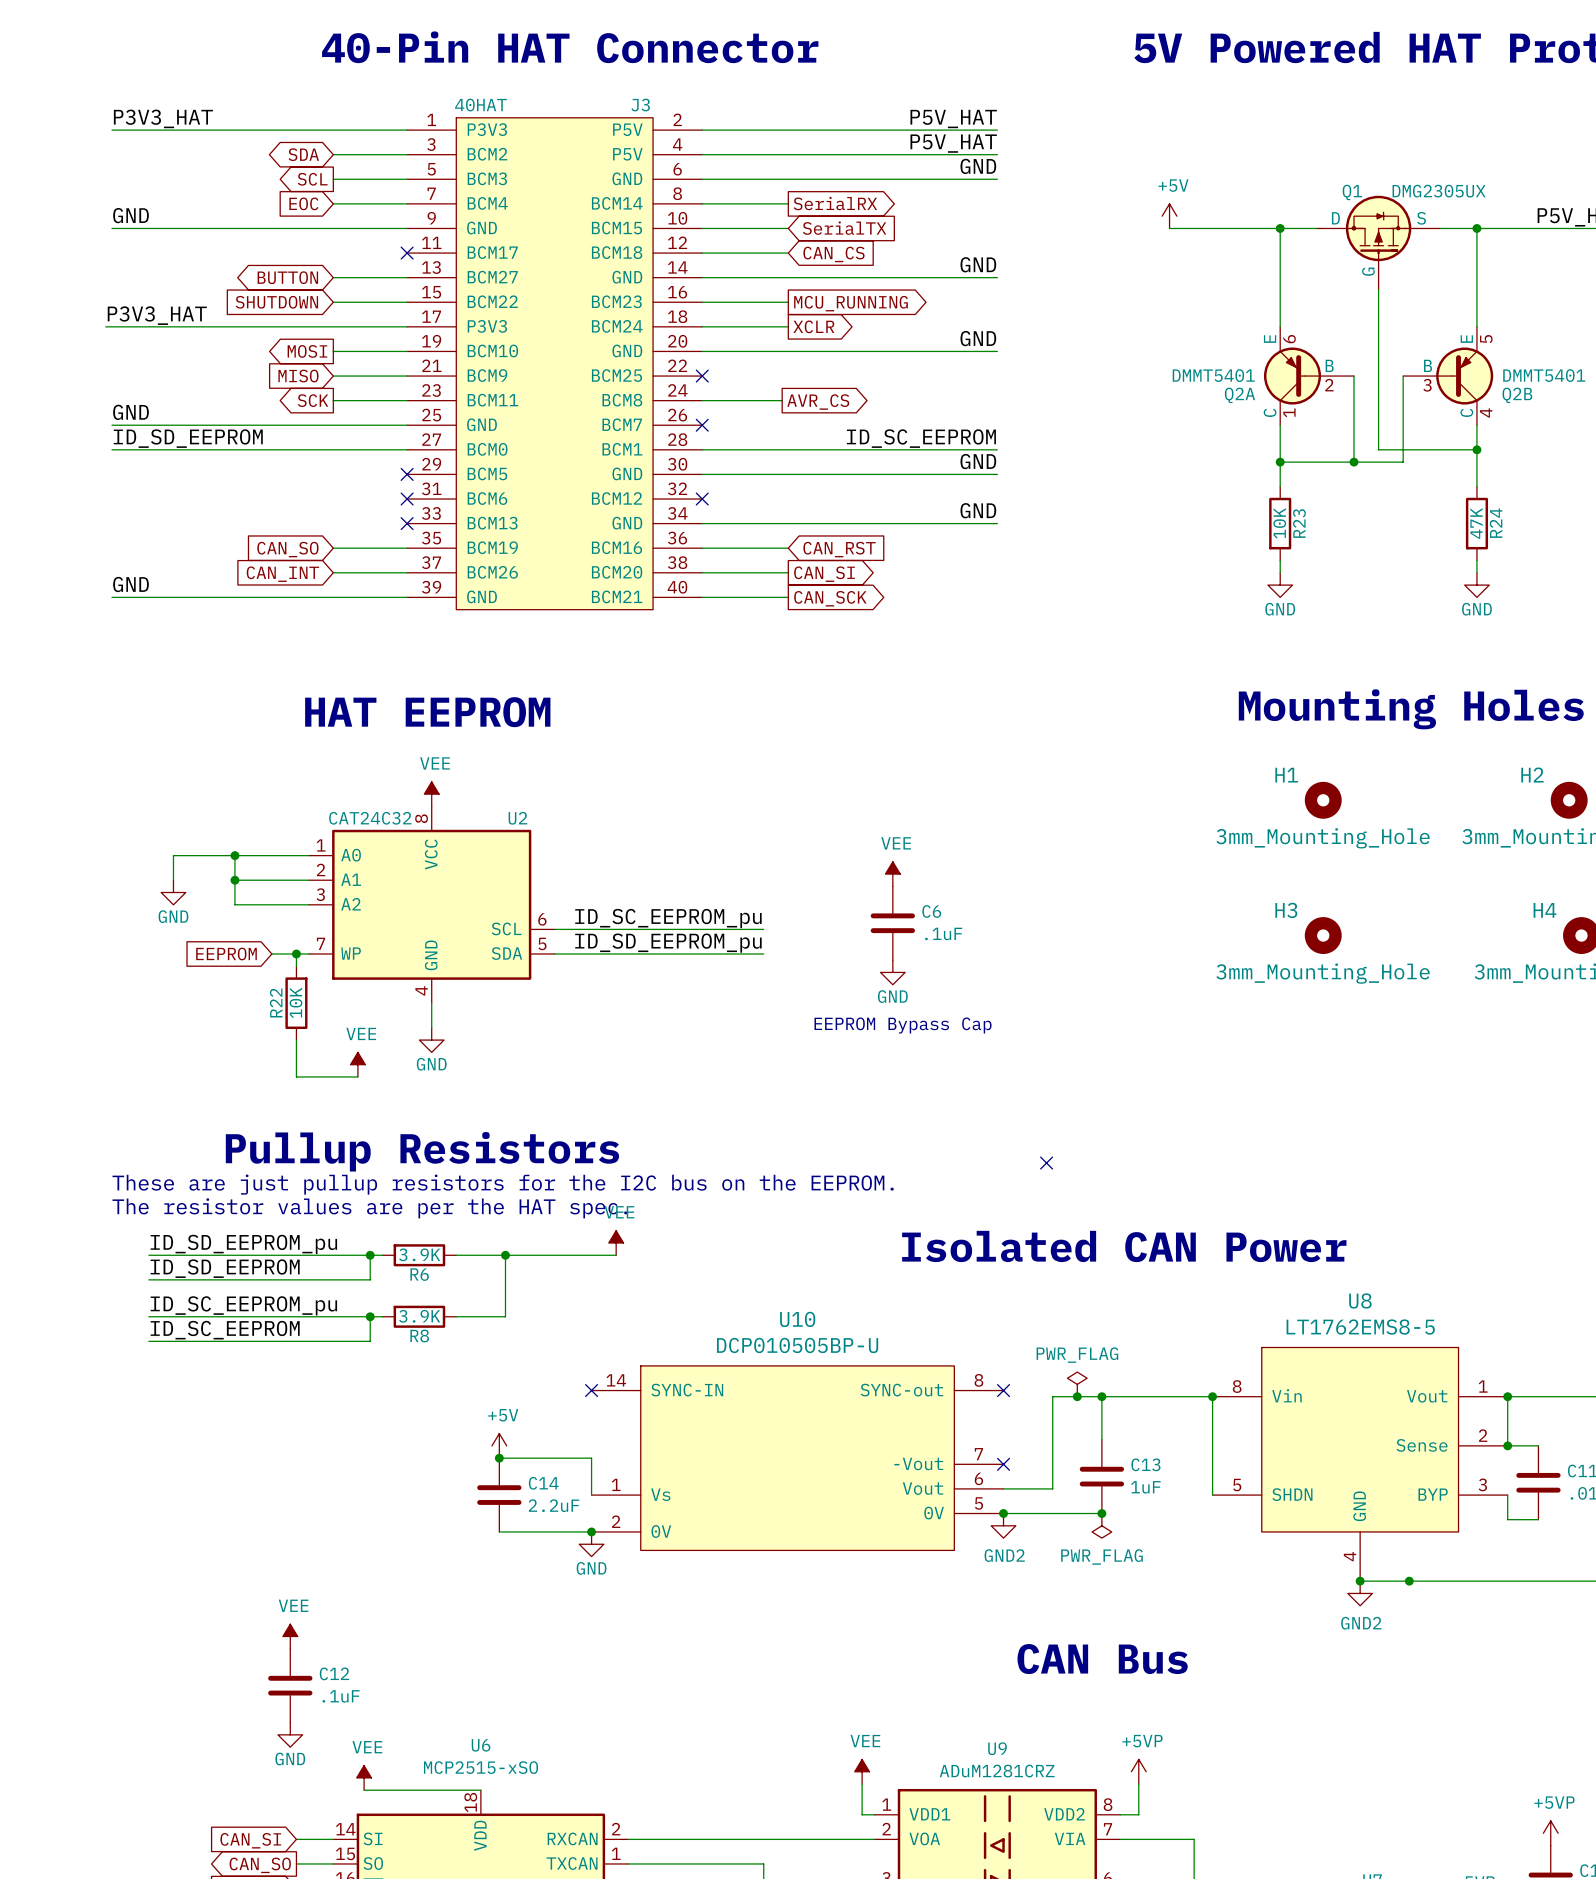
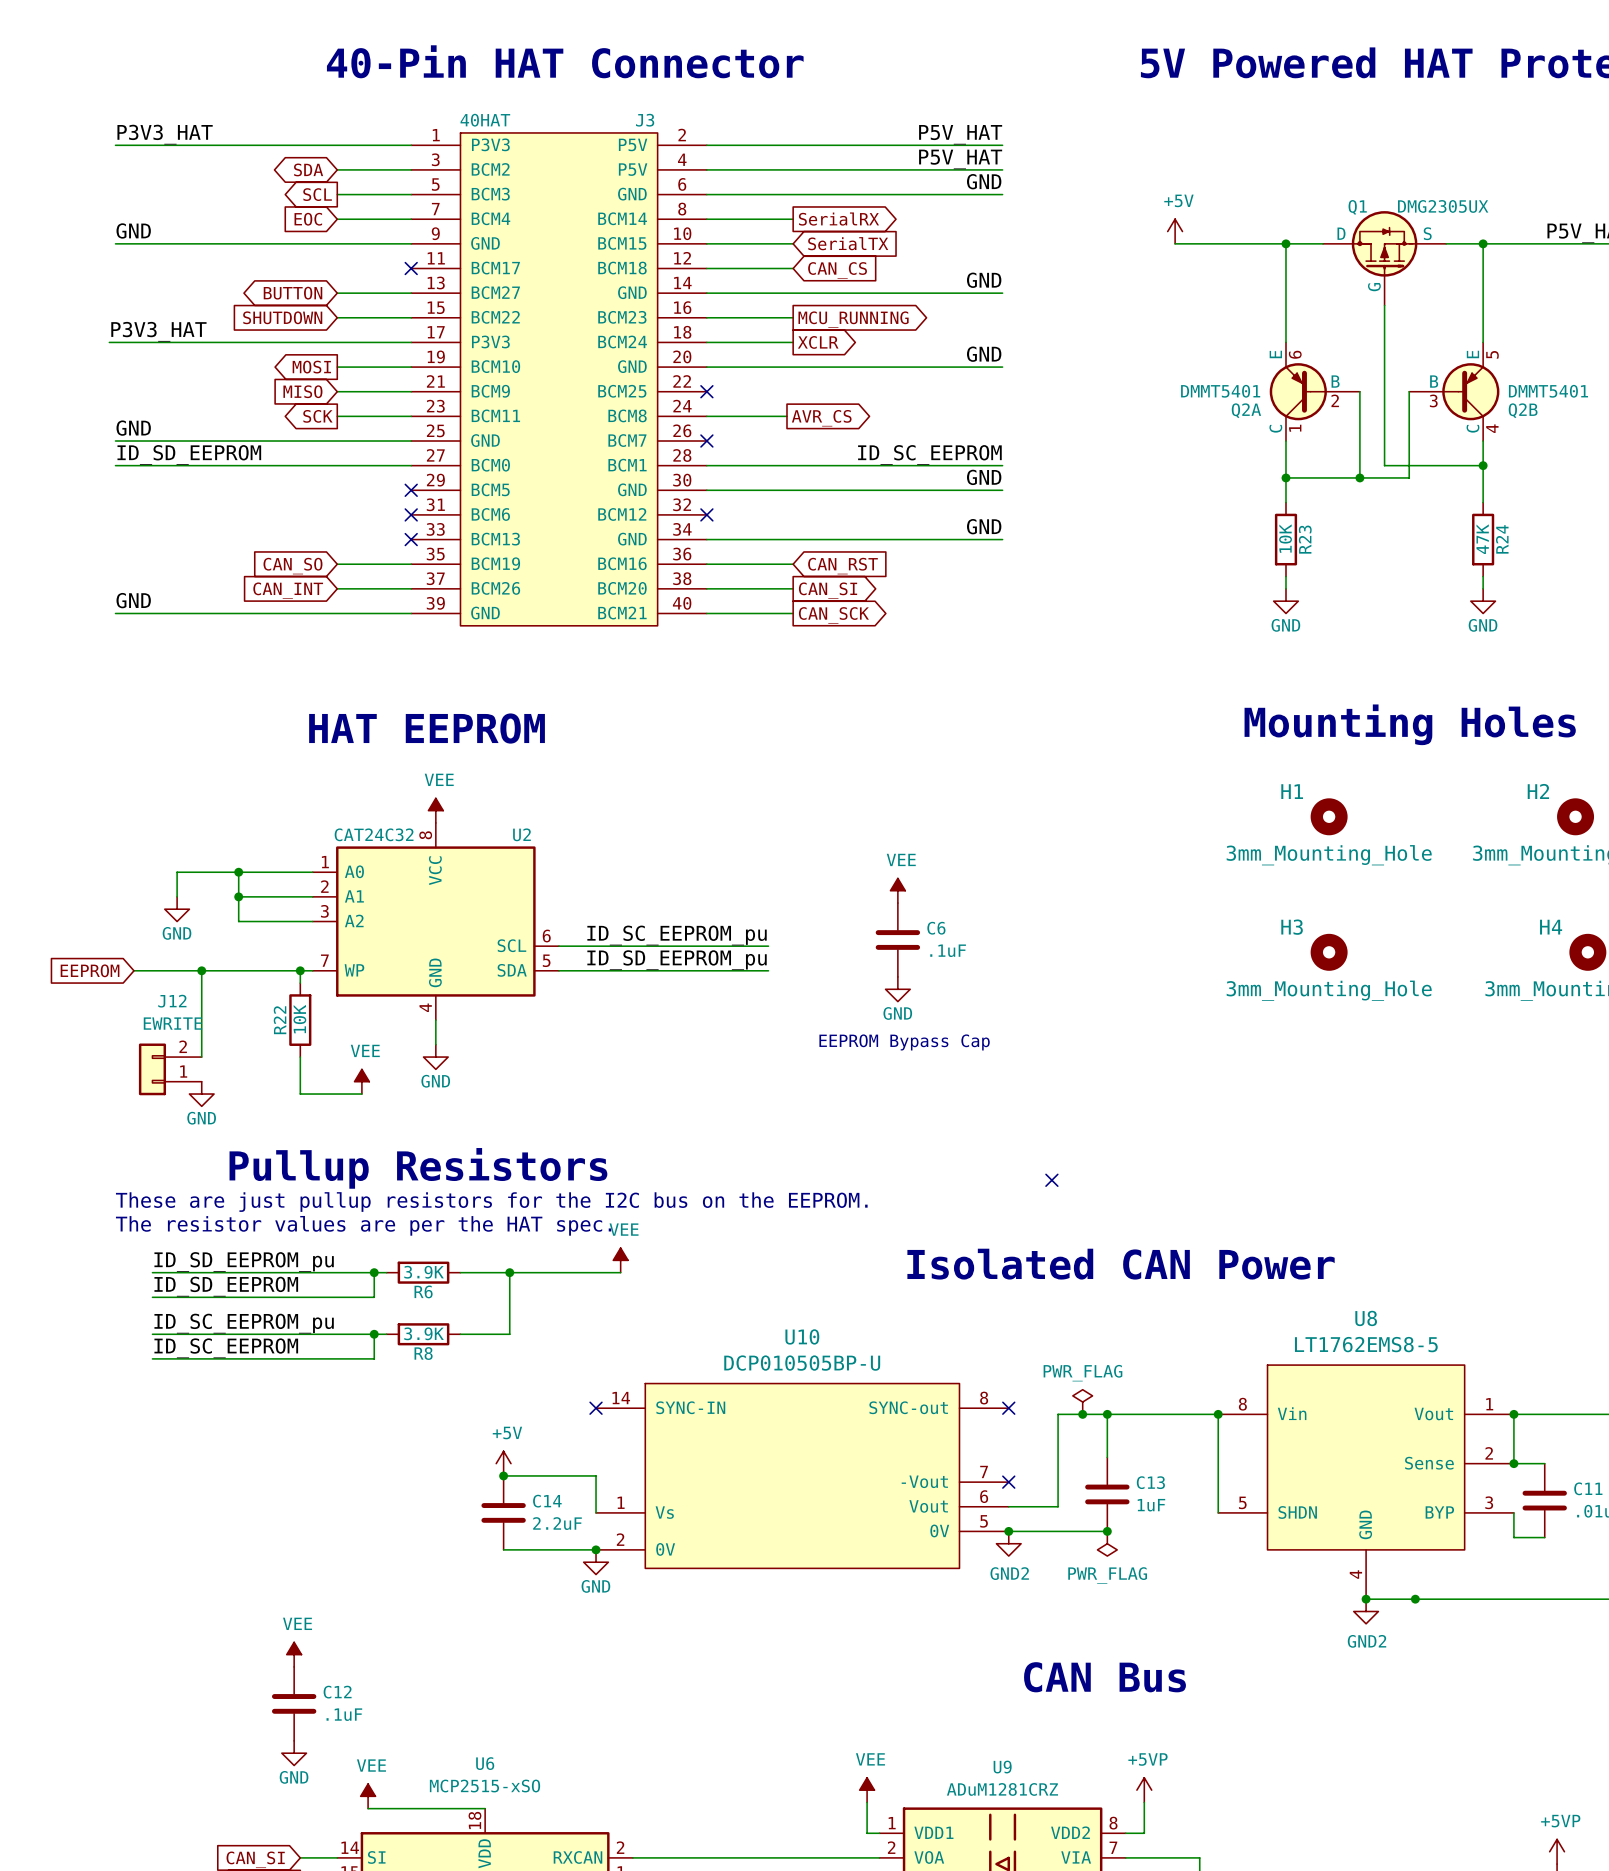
wire: none -> (133, 970) (275, 970)
wire: none -> (201, 970) (201, 1057)
junction: none -> (201, 970)
global label position: EEPROM (226, 954) -> EEPROM (90, 970)
J12: none -> EWRITE (170, 1069)
power symbol: none -> GND (201, 1094)

